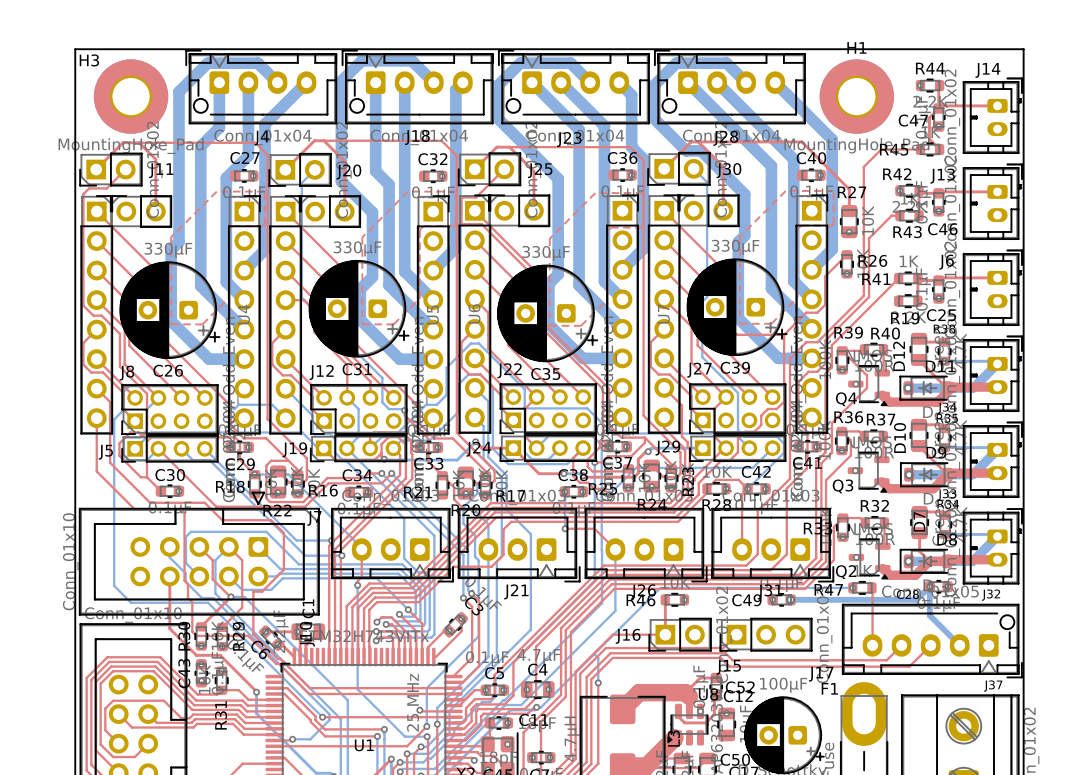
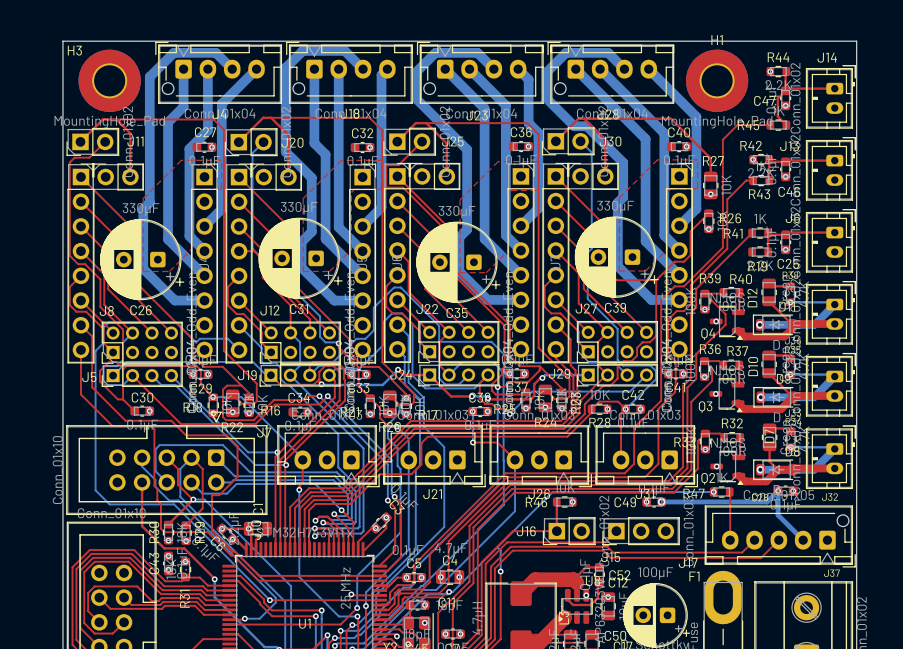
via: none -> (213, 413)
via: none -> (370, 414)

